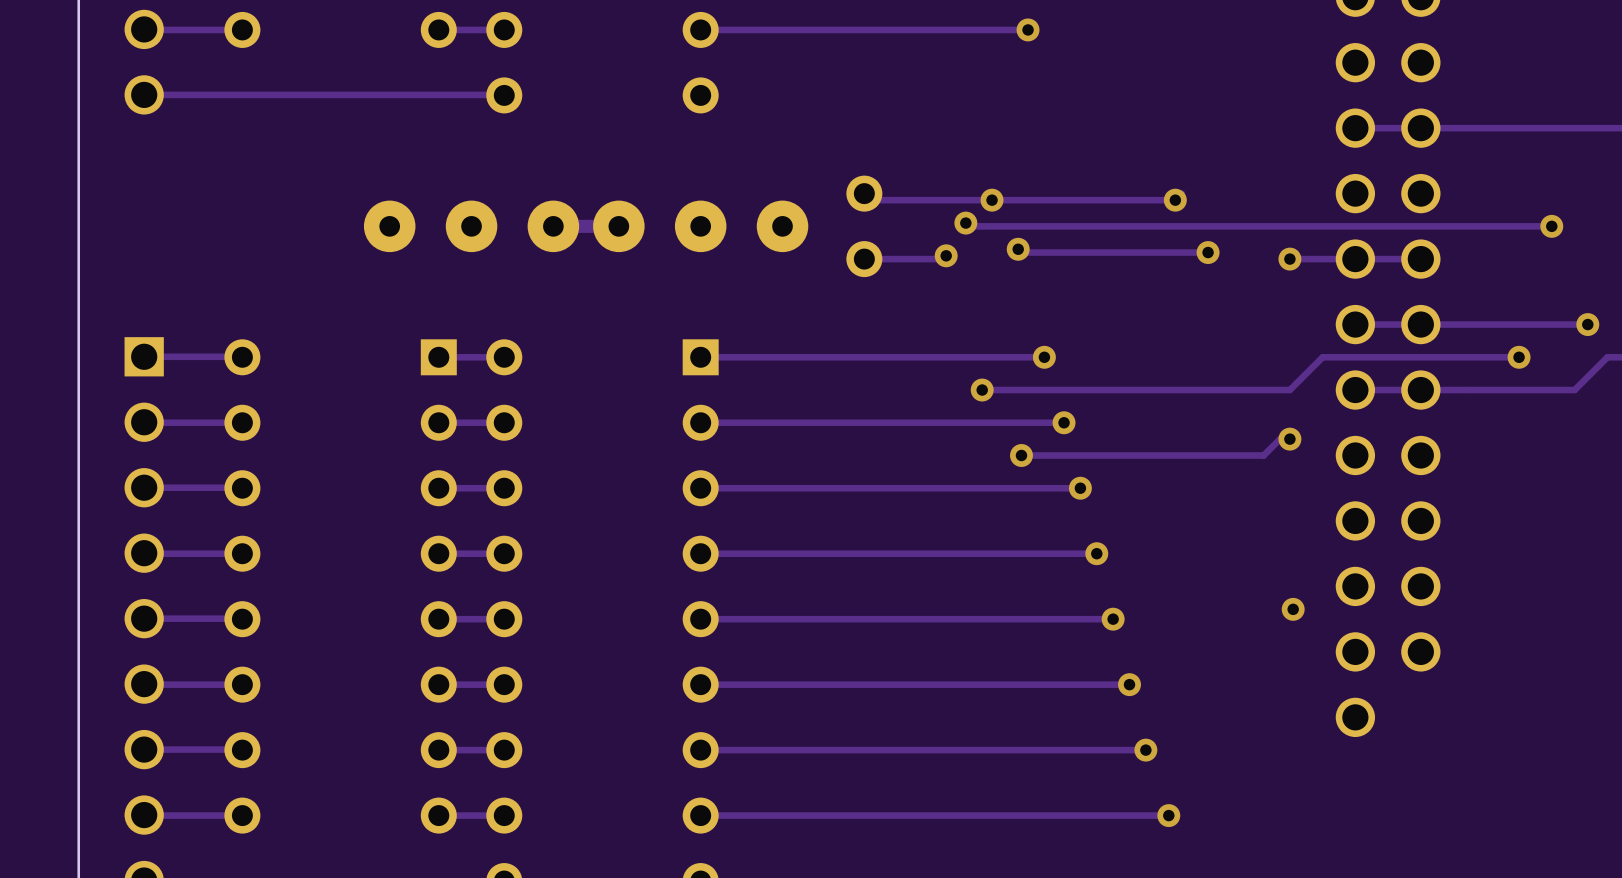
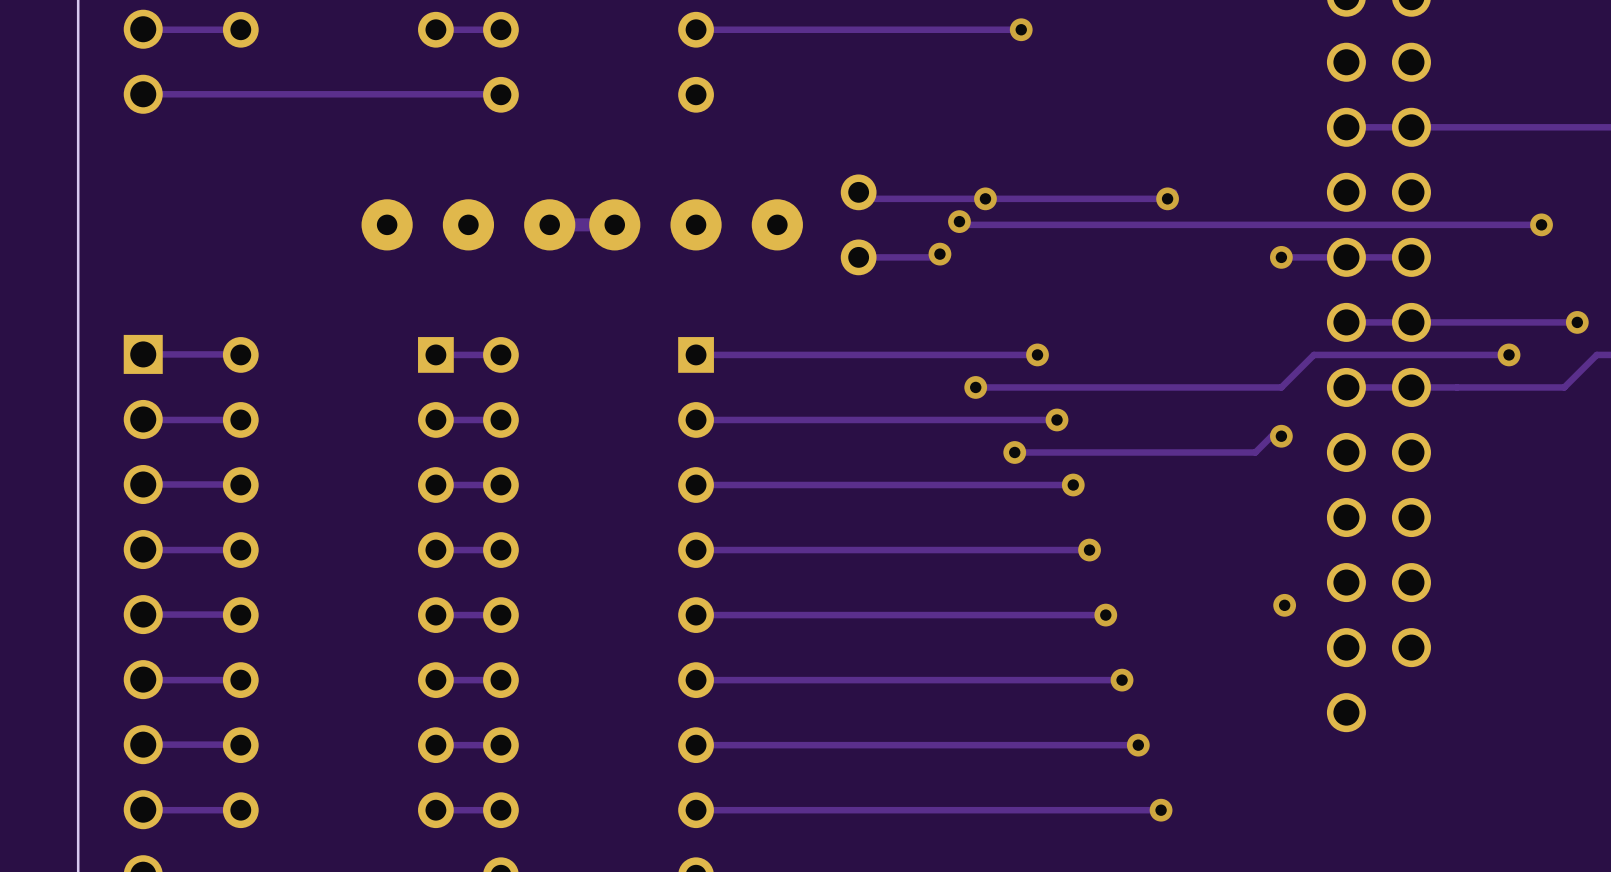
track: (1018, 249) (1021, 252) (1208, 252) -> none
via: (1018, 249) -> none
via: (1208, 252) -> none

